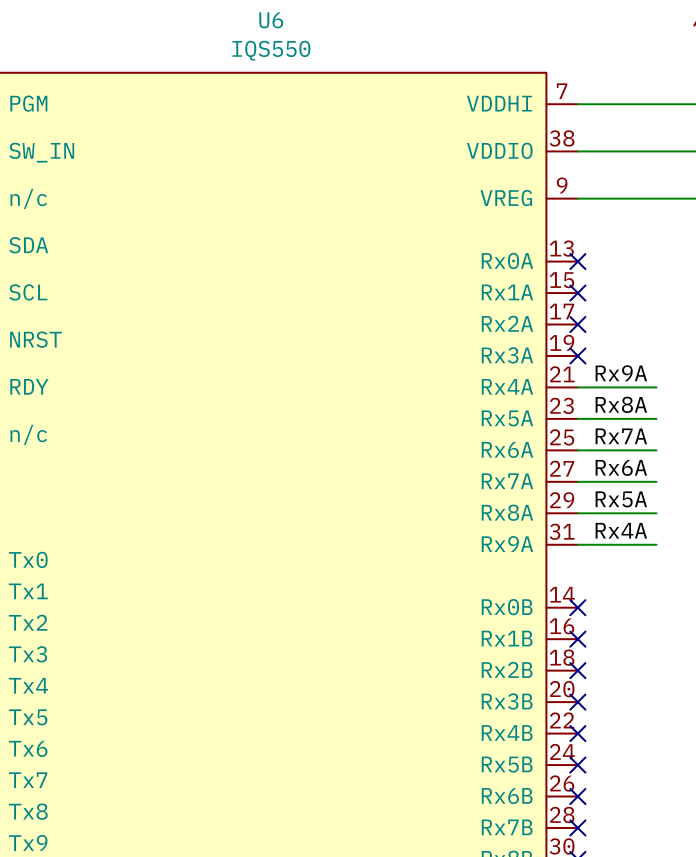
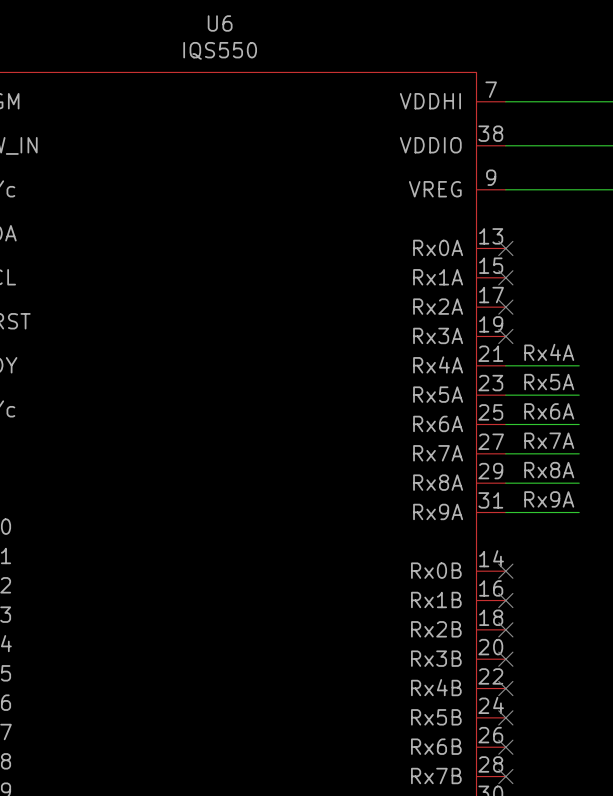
label: Rx9A (621, 373) -> Rx4A (549, 352)
label: Rx8A (621, 404) -> Rx5A (549, 382)
label: Rx7A (621, 436) -> Rx6A (549, 411)
label: Rx6A (621, 467) -> Rx7A (549, 440)
label: Rx5A (621, 499) -> Rx8A (549, 470)
label: Rx4A (621, 530) -> Rx9A (549, 499)

